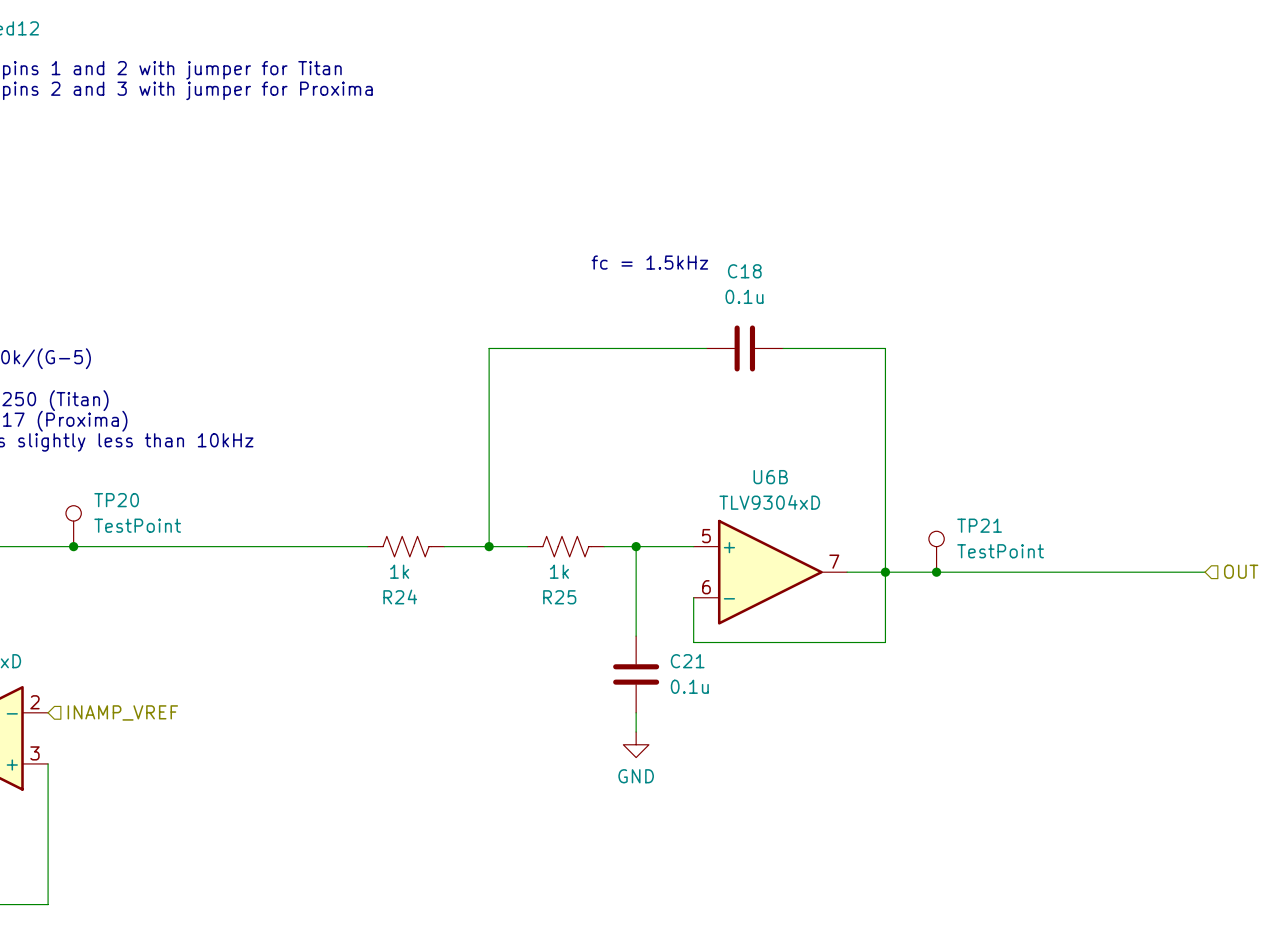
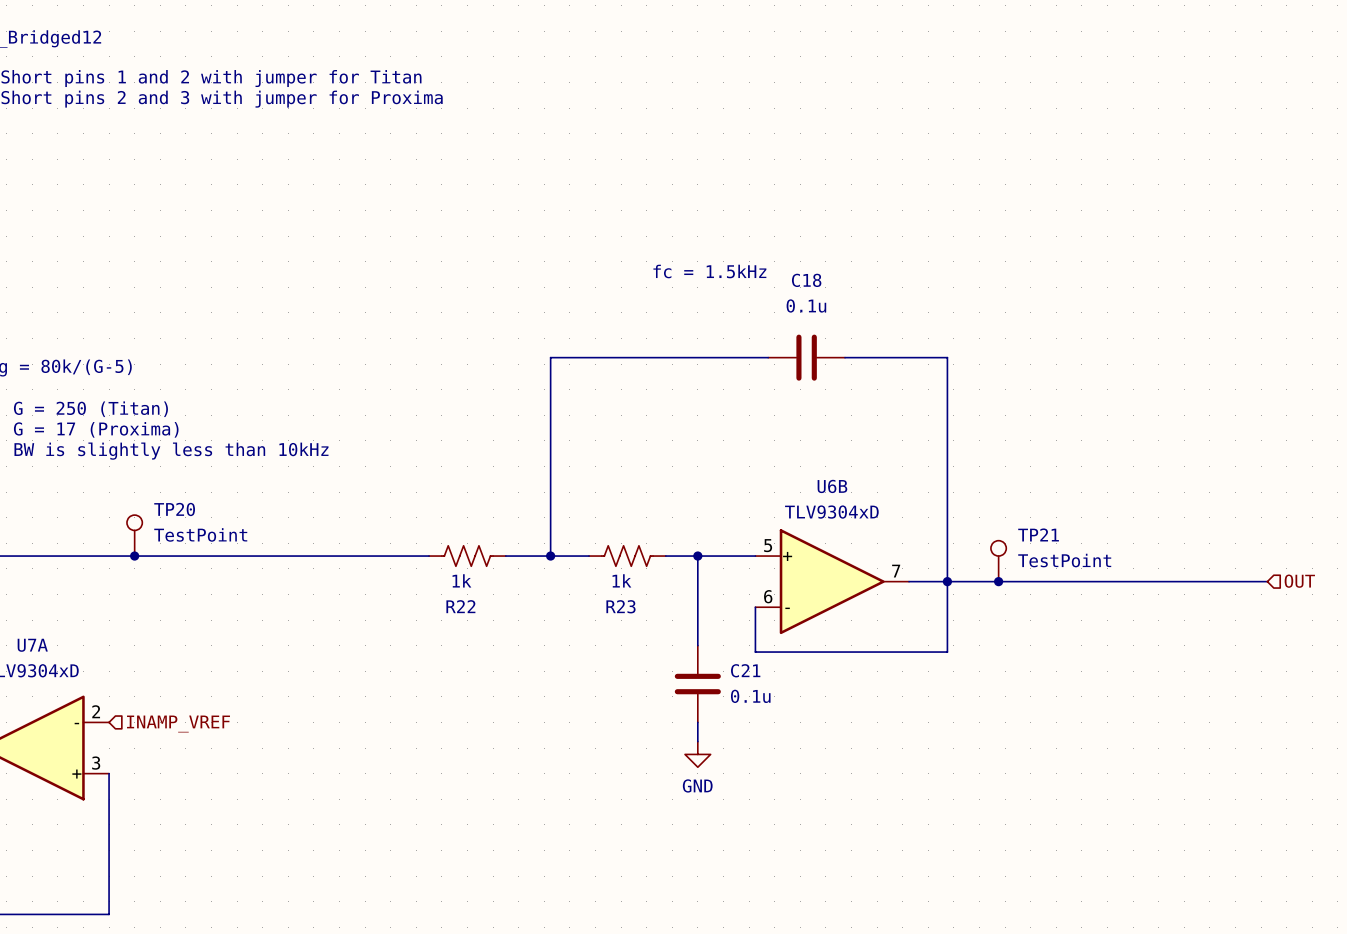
R24 name: R24 (400, 596) -> R22 (460, 606)
R25 name: R25 (559, 597) -> R23 (620, 606)

